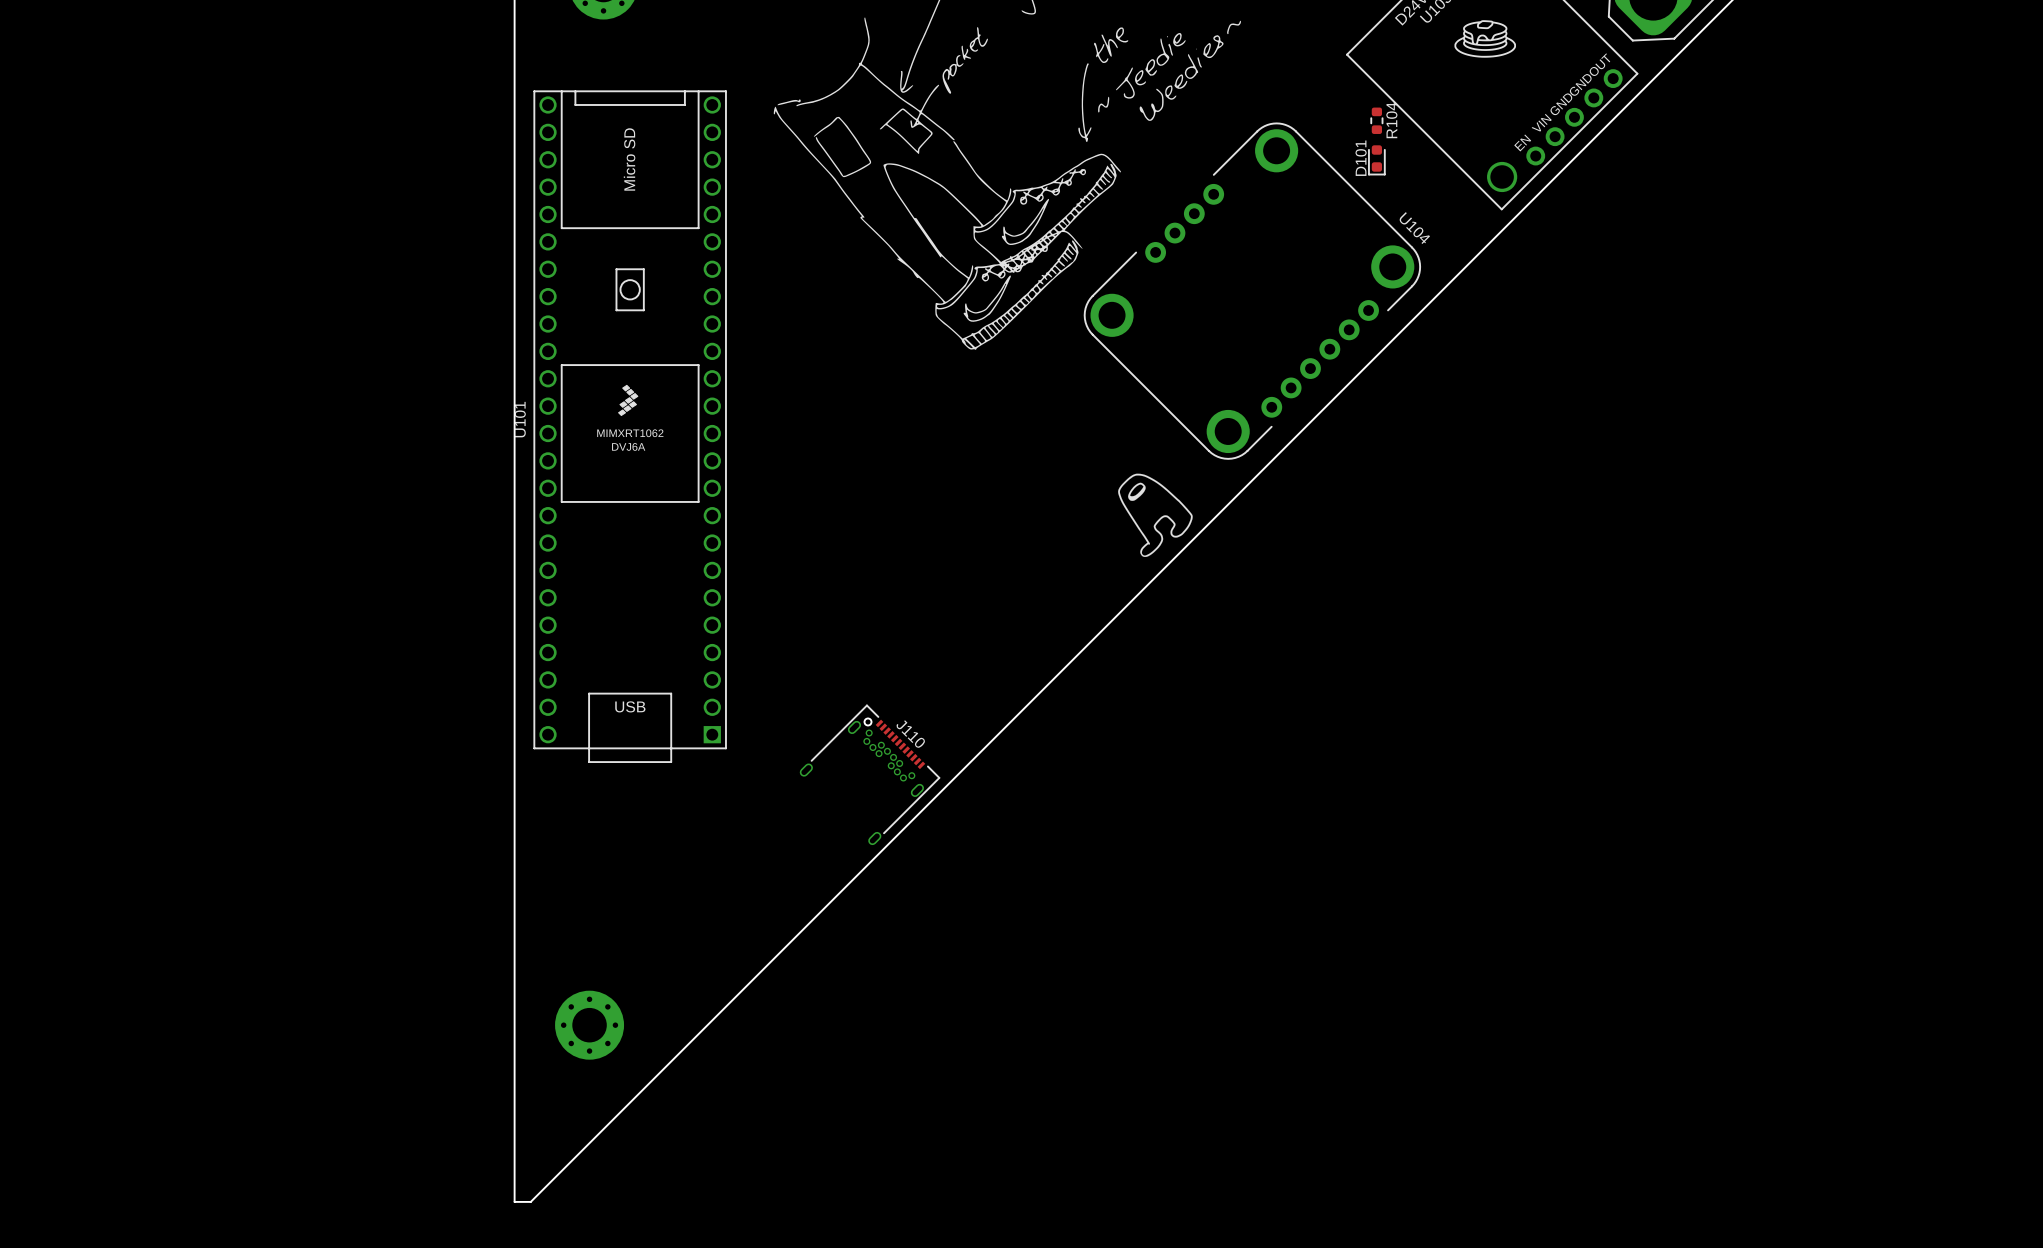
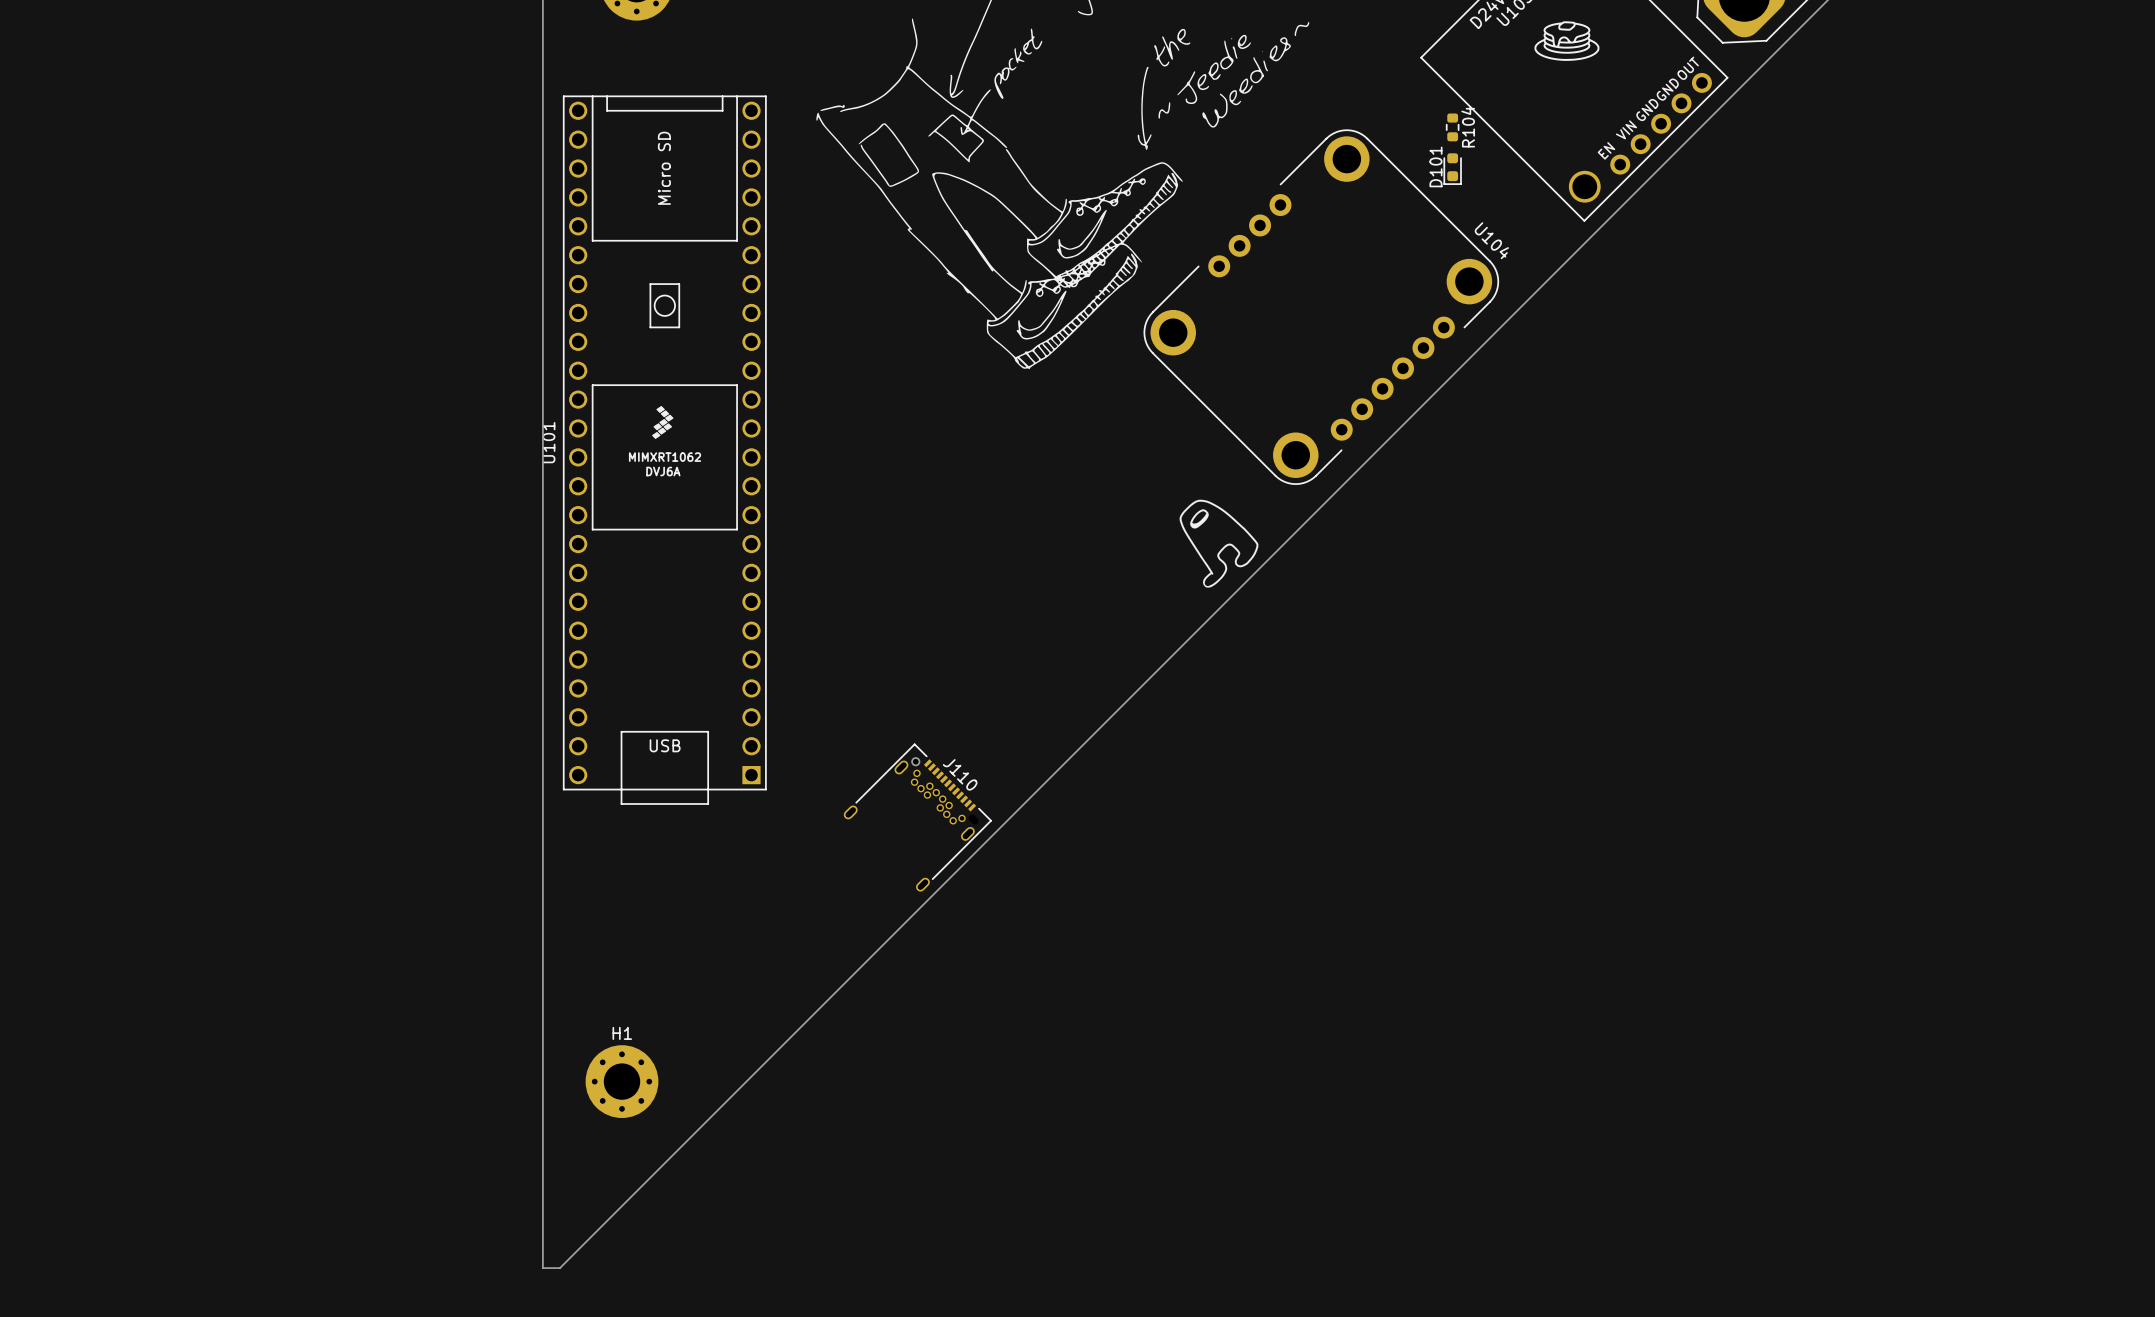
H1 name: none -> H1 (622, 1033)

